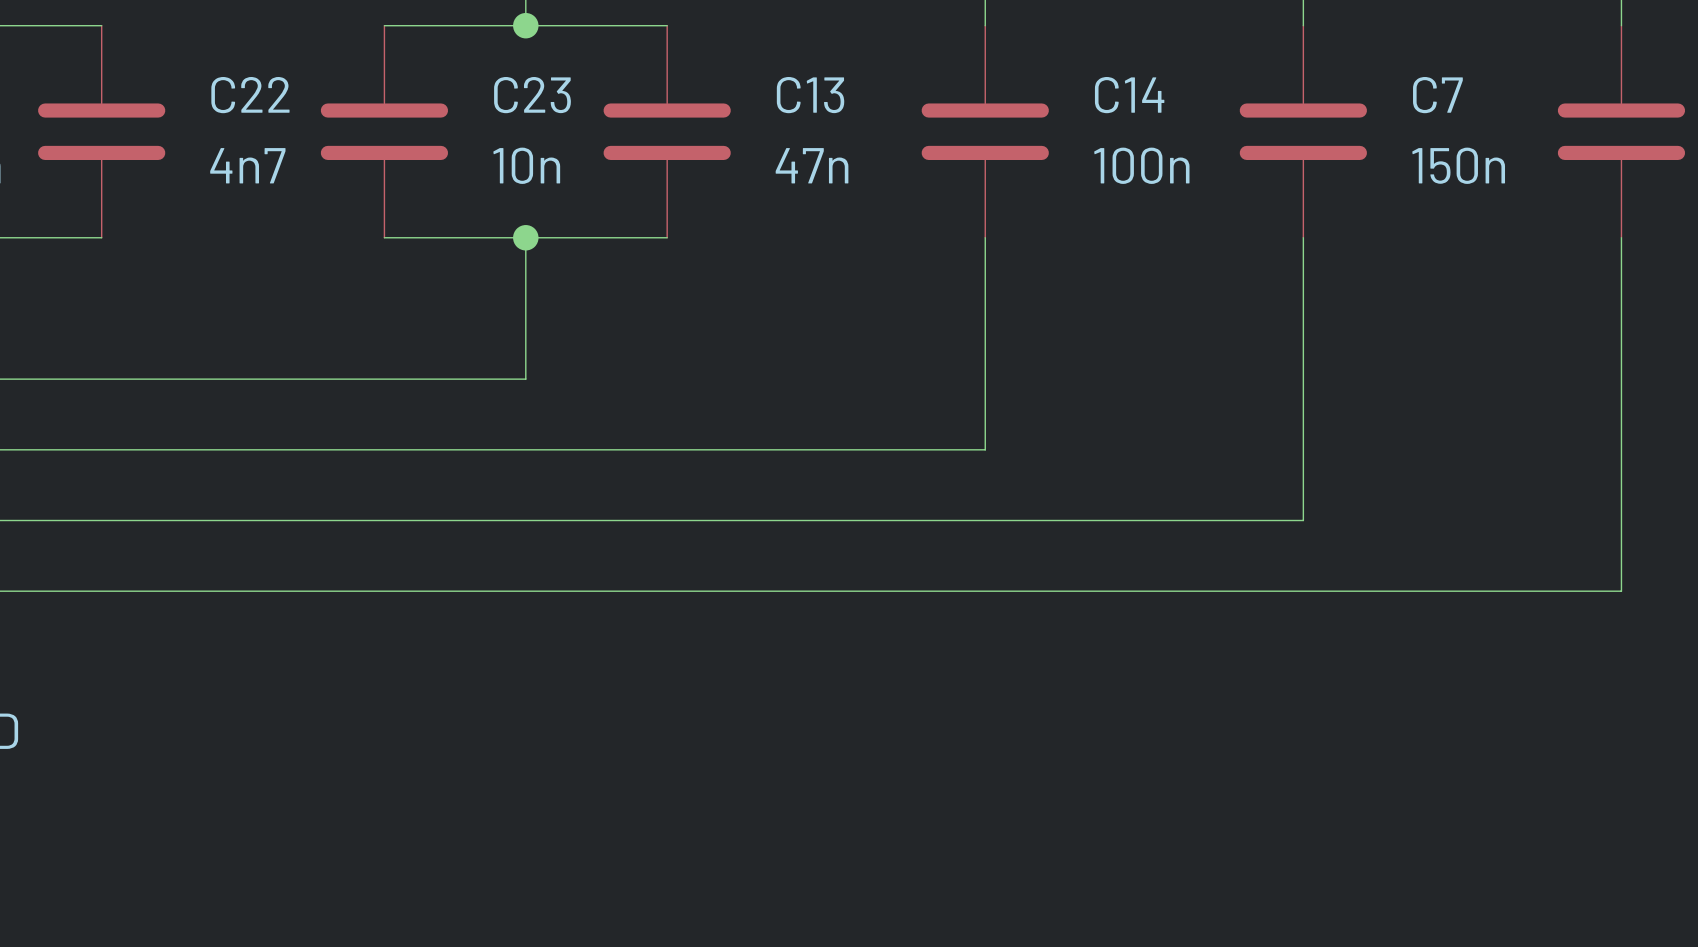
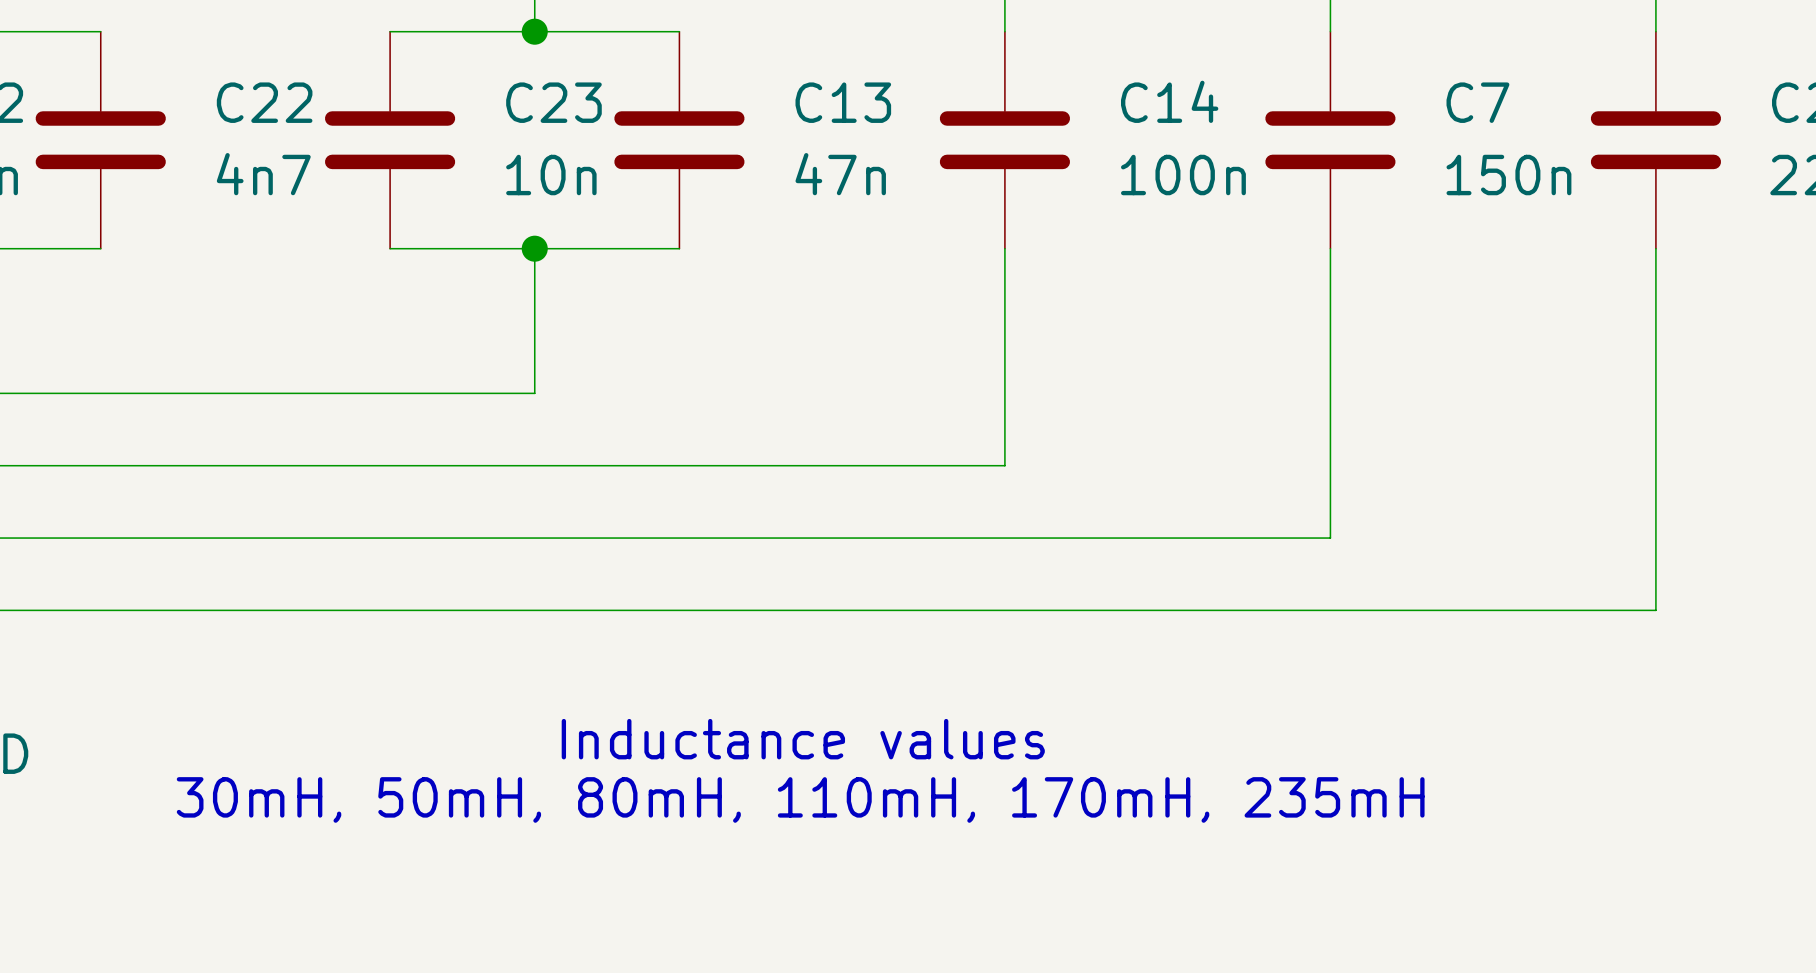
text: none -> Inductance values (803, 739)
text: none -> 30mH, 50mH, 80mH, 110mH, 170mH, 235mH (800, 799)

